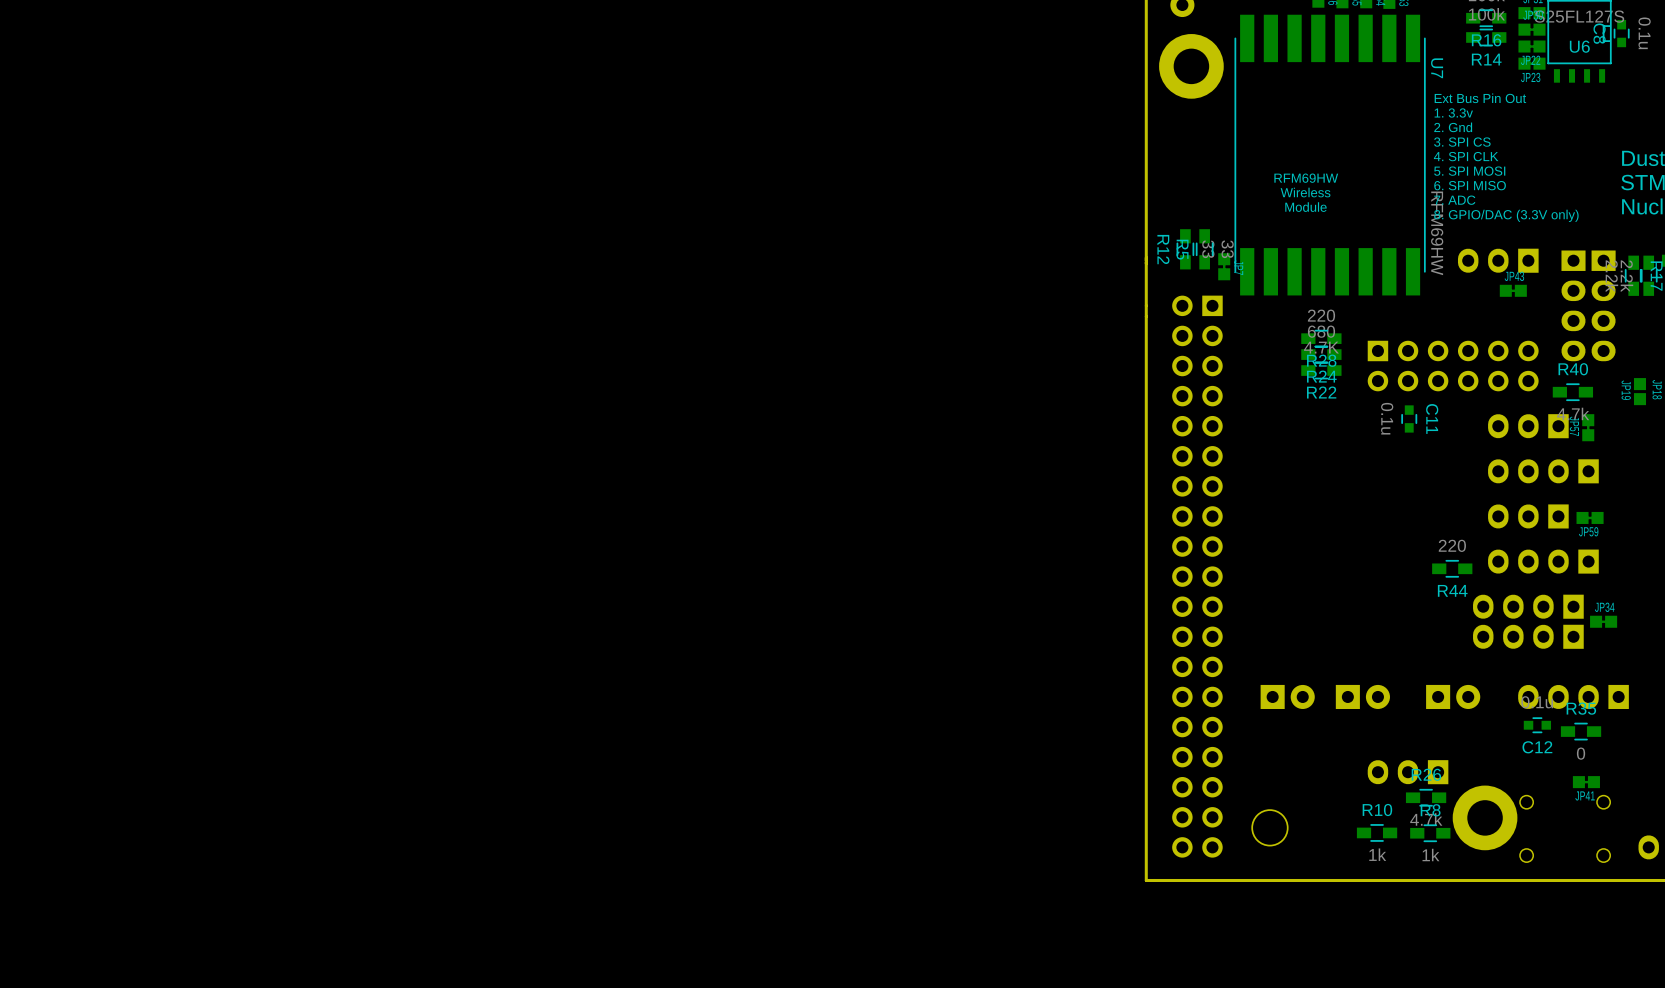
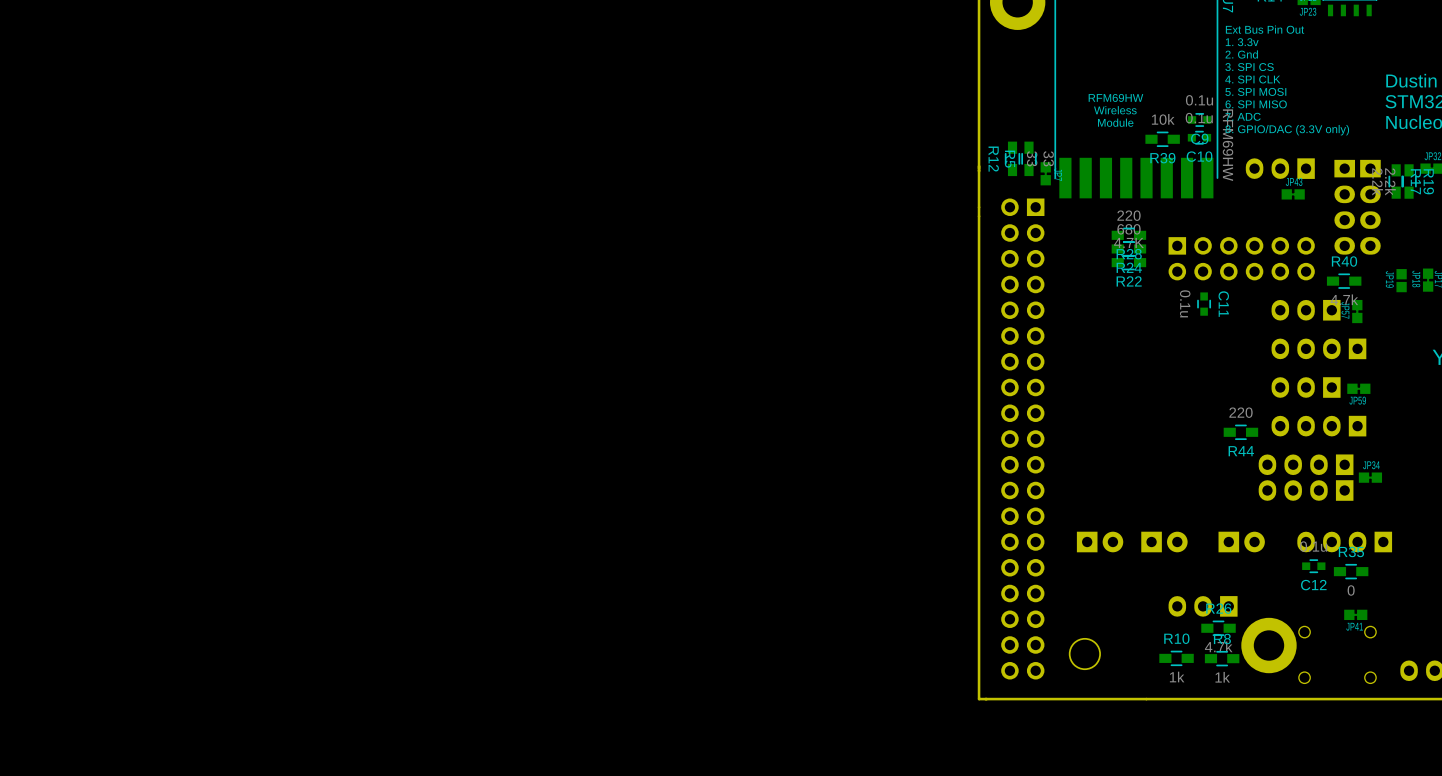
C9: none -> 0.1u (1199, 119)
C10: none -> 0.1u (1199, 137)
R39: none -> 10k (1162, 139)

